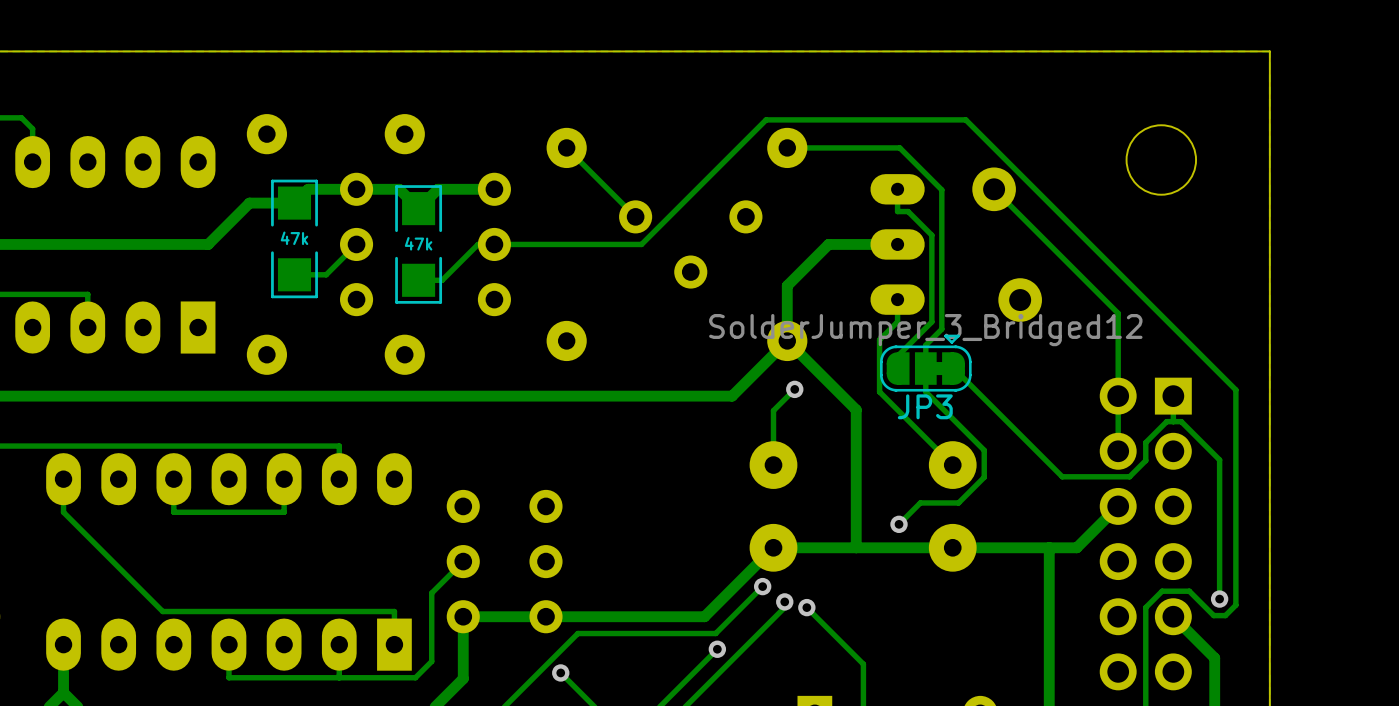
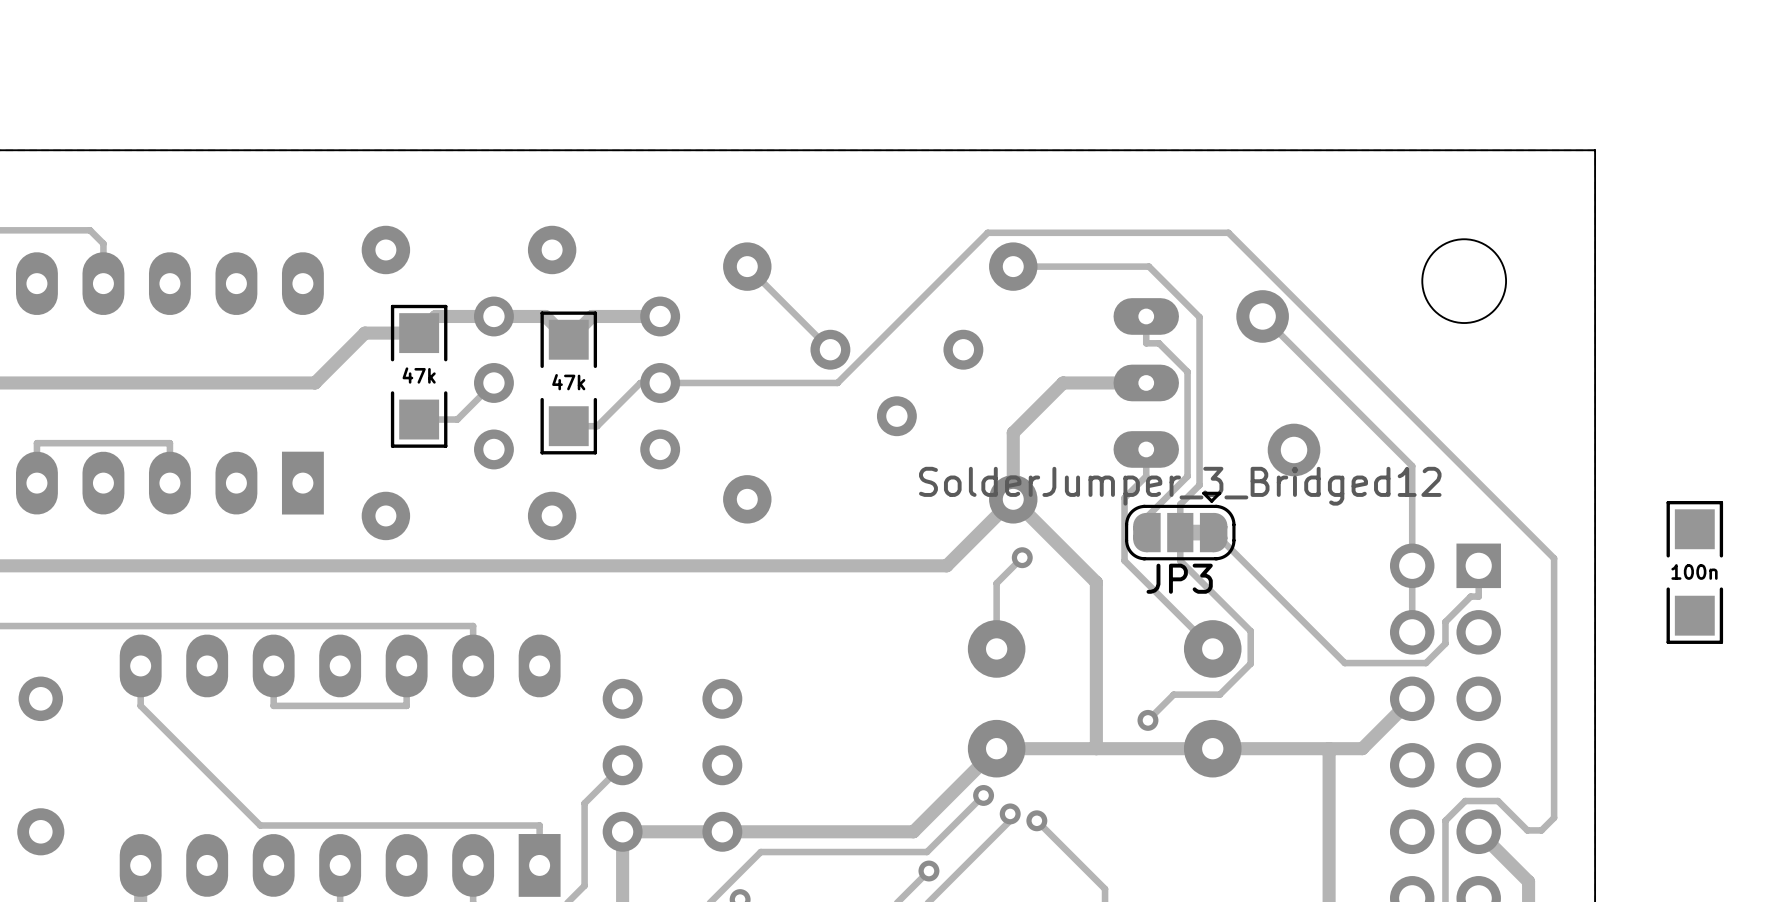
part: none -> 100n (1694, 572)
track: (1173, 421) (1181, 421) (1219, 459) (1219, 599) -> none
via: (1219, 599) -> none

